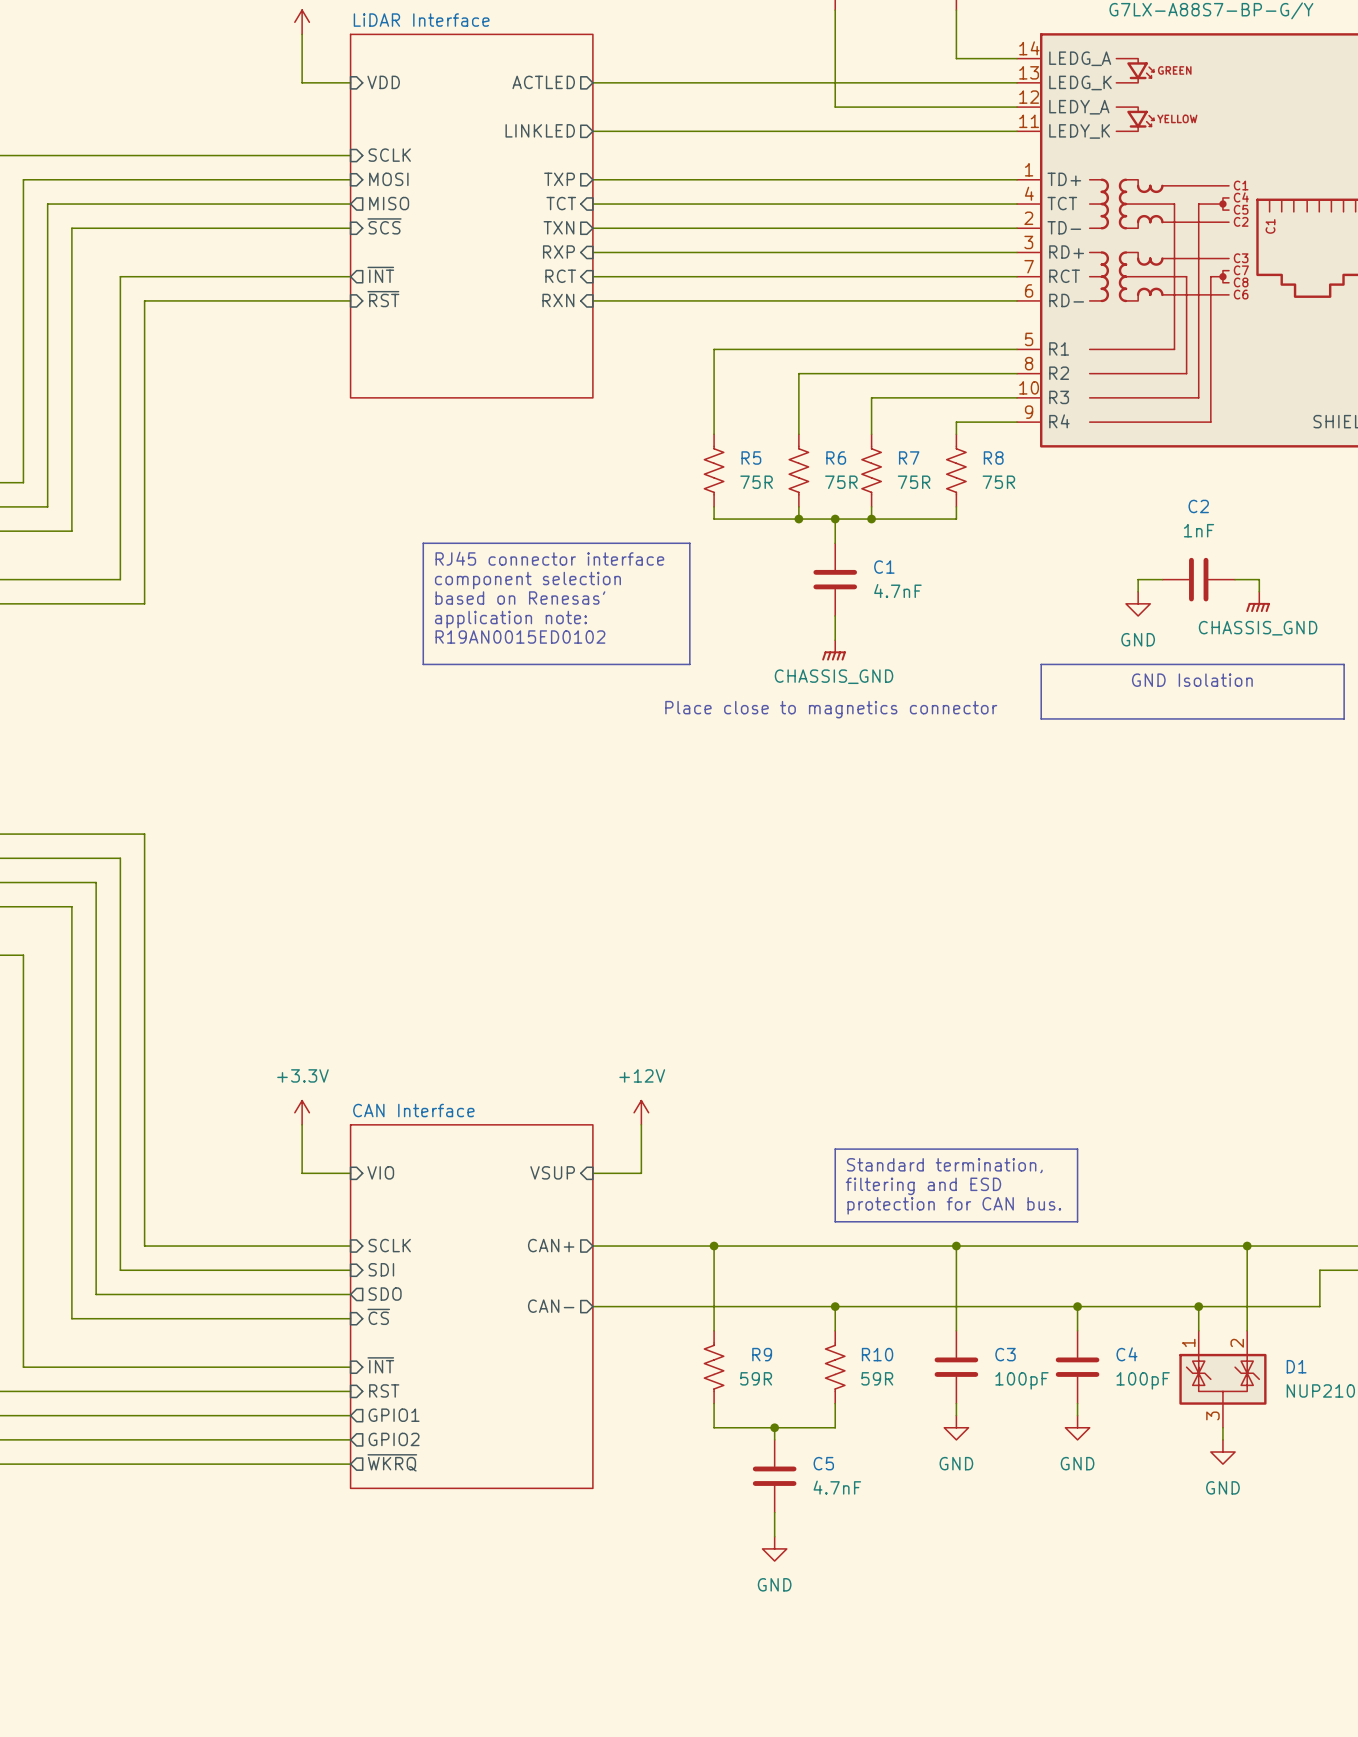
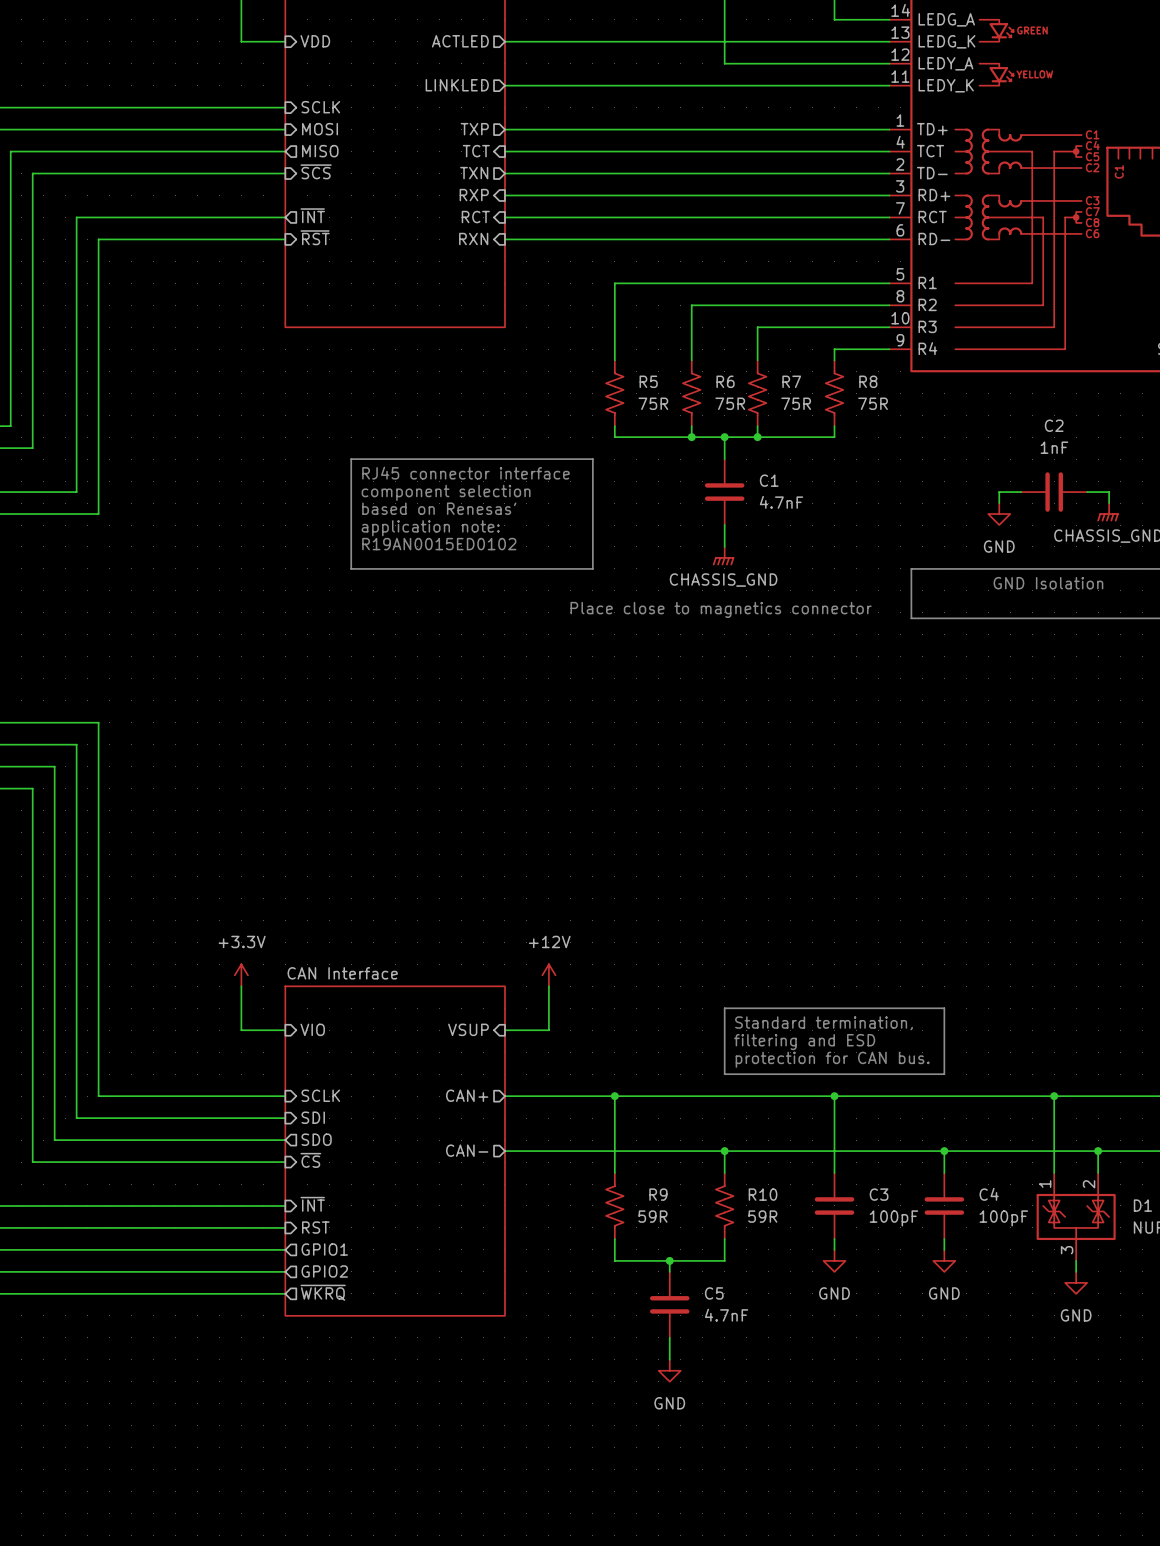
junction: none -> (1054, 1096)
wire: (1247, 1246) (1247, 1306) -> (1054, 1096) (1054, 1151)
junction: (1247, 1246) -> none
junction: (1198, 1306) -> none
junction: none -> (1098, 1151)

